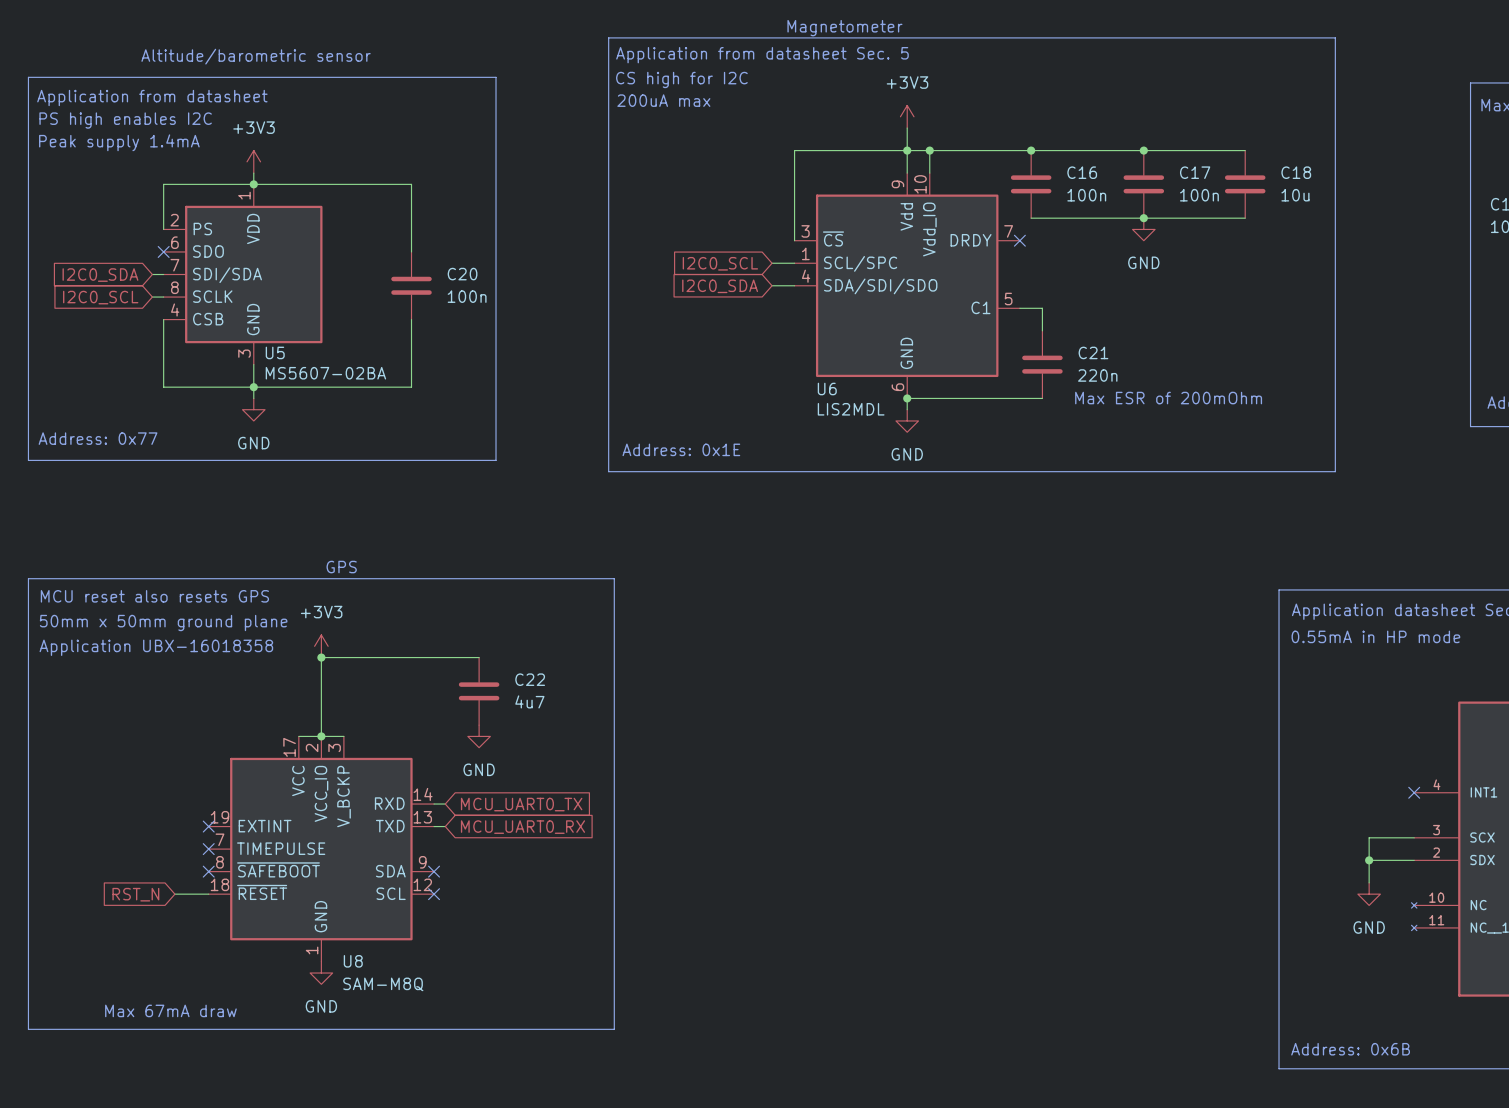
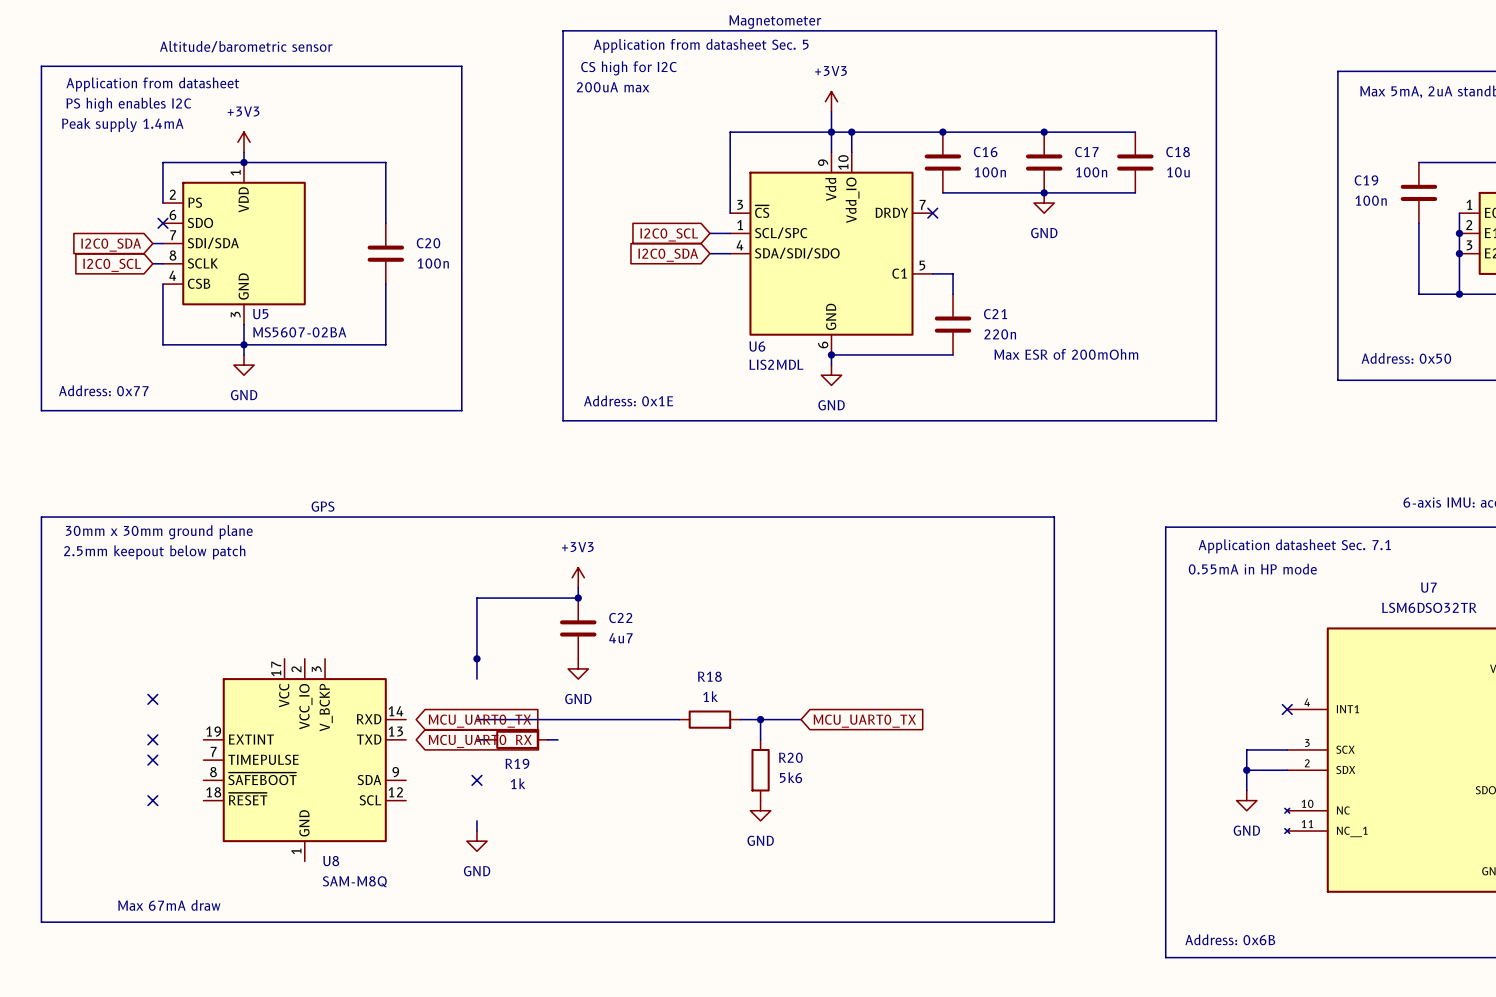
line: (614, 578) (614, 1029) -> (568, 517) (1054, 517) (1054, 922) (568, 922)
text: MCU reset also resets GPS (154, 596) -> 30mm x 30mm ground plane (159, 532)
text: none -> 2.5mm keepout below patch (154, 552)
text: 50mm x 50mm ground plane (163, 623) -> none
power symbol: +3V3 (321, 646) -> none
power symbol: none -> +3V3 (578, 577)
text: Application UBX-16018358 (156, 647) -> none
junction: (321, 657) -> none
wire: (479, 657) (321, 657) (321, 736) -> none
wire: none -> (578, 587) (578, 598) (476, 598) (476, 679)
junction: none -> (578, 598)
C22 position: (479, 691) -> (578, 628)
wire: (298, 736) (343, 736) -> none
junction: (321, 736) -> none
power symbol: GND (479, 736) -> none
junction: none -> (476, 658)
power symbol: none -> GND (578, 668)
no-connect mark: none -> (152, 699)
wire: (434, 804) (445, 804) -> (547, 739) (558, 739)
wire: none -> (476, 719) (679, 719)
R18: none -> 1k (709, 719)
wire: none -> (740, 719) (801, 719)
wire: none -> (760, 719) (760, 739)
junction: none -> (760, 719)
global label: none -> MCU_UART0_TX (864, 721)
no-connect mark: none -> (152, 739)
no-connect mark: (208, 826) -> none
wire: (434, 826) (445, 826) -> (476, 739) (487, 739)
R19: none -> 1k (517, 739)
no-connect mark: none -> (152, 760)
no-connect mark: (208, 849) -> none
R20: none -> 5k6 (760, 770)
no-connect mark: (208, 871) -> none
no-connect mark: (434, 871) -> none
no-connect mark: none -> (476, 780)
global label: RST_N (135, 894) -> none
no-connect mark: none -> (152, 800)
wire: (174, 894) (208, 894) -> none
no-connect mark: (434, 894) -> none
power symbol: none -> GND (760, 810)
wire: none -> (476, 820) (476, 831)
power symbol: none -> GND (476, 841)
power symbol: GND (321, 973) -> none

